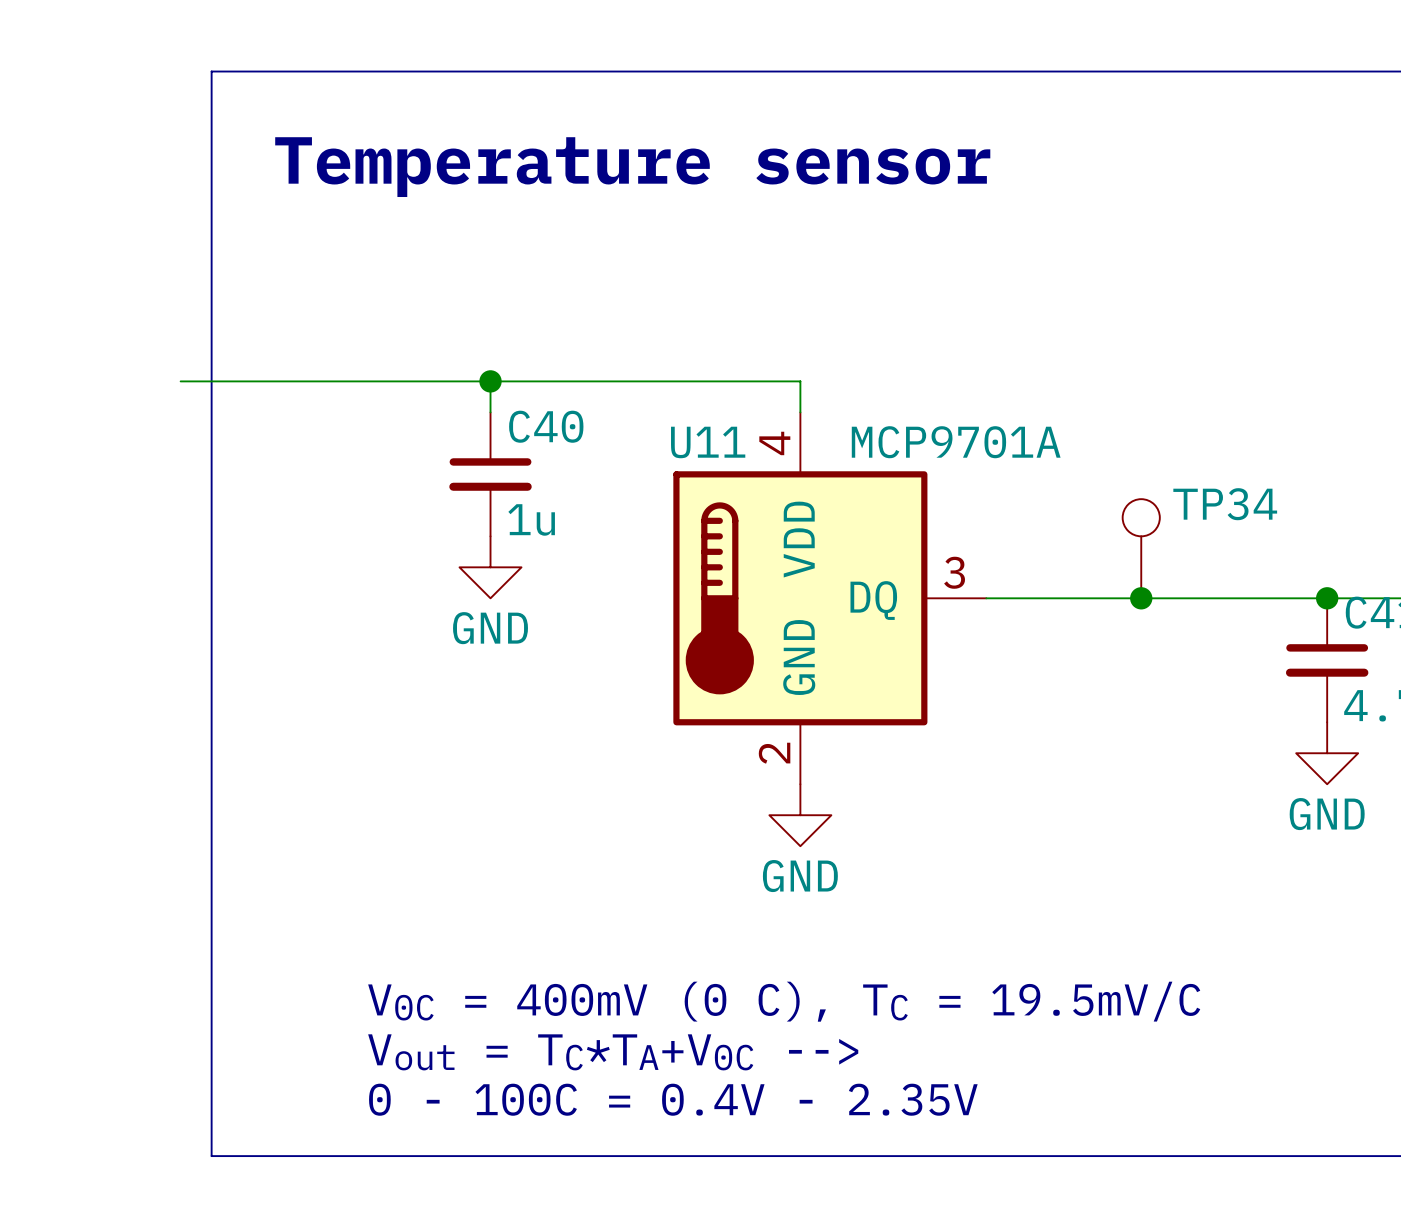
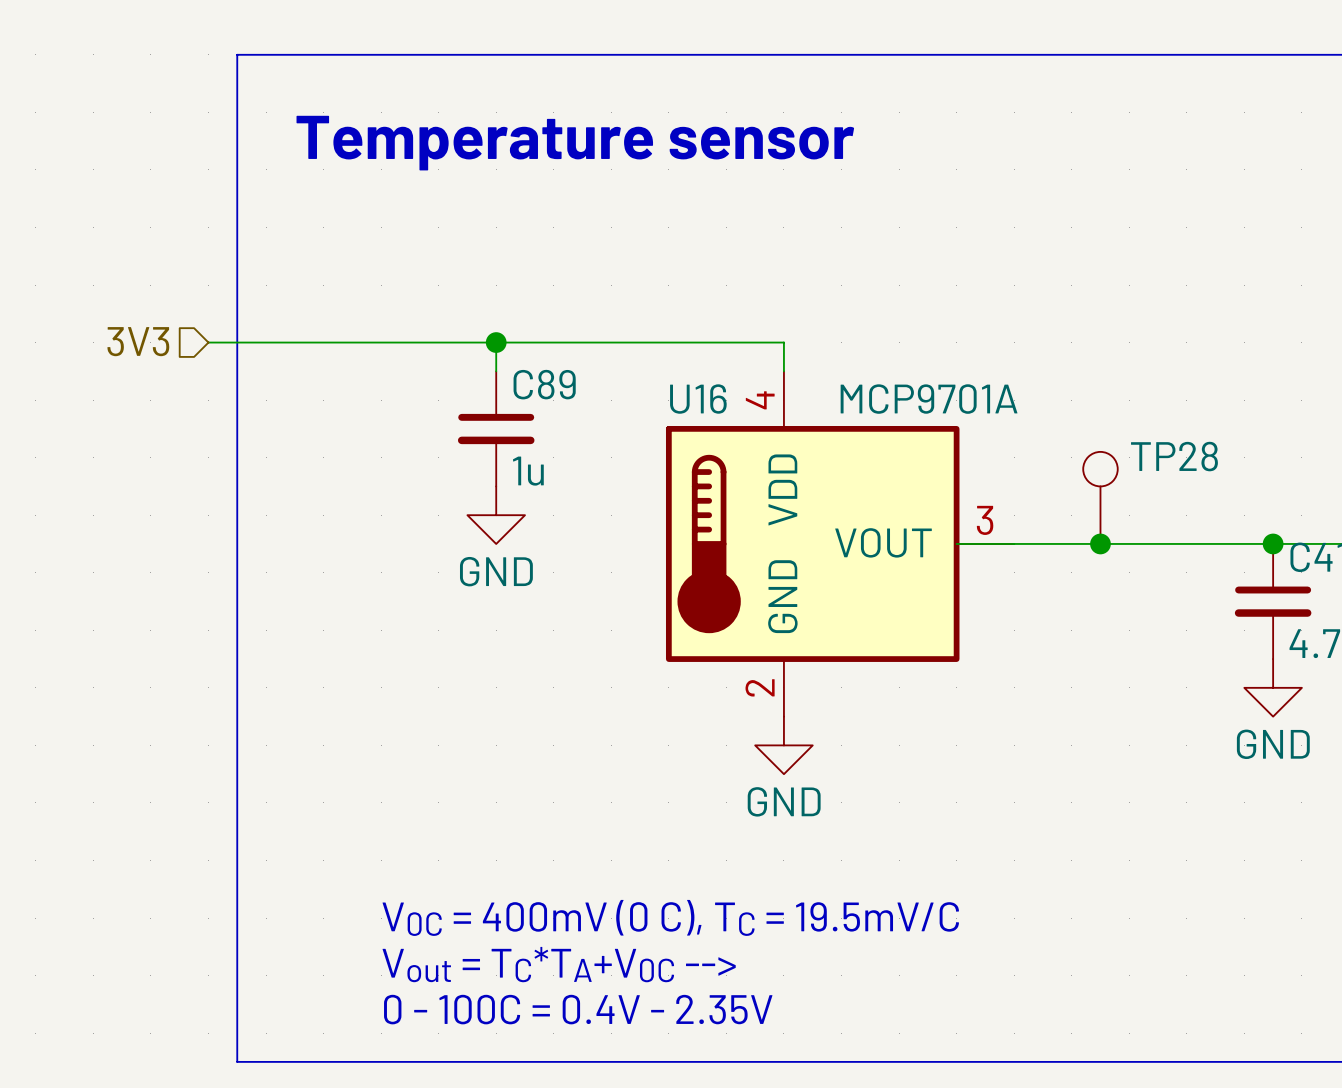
hierarchical label: none -> 3V3 (138, 341)
C40 name: C40 (546, 426) -> C89 (544, 384)
TP34 name: TP34 (1225, 504) -> TP28 (1174, 456)
U11: MCP9701A (829, 598) -> none
U16: none -> MCP9701A (840, 543)

